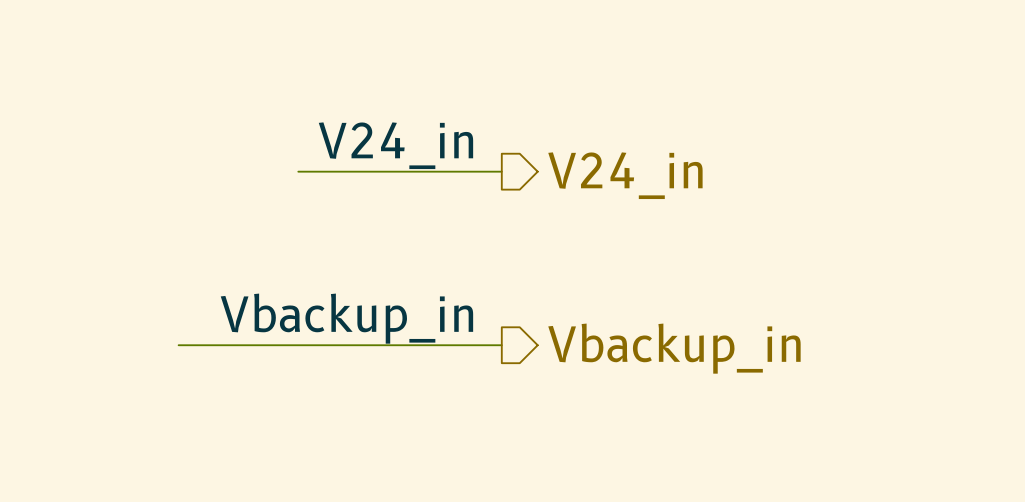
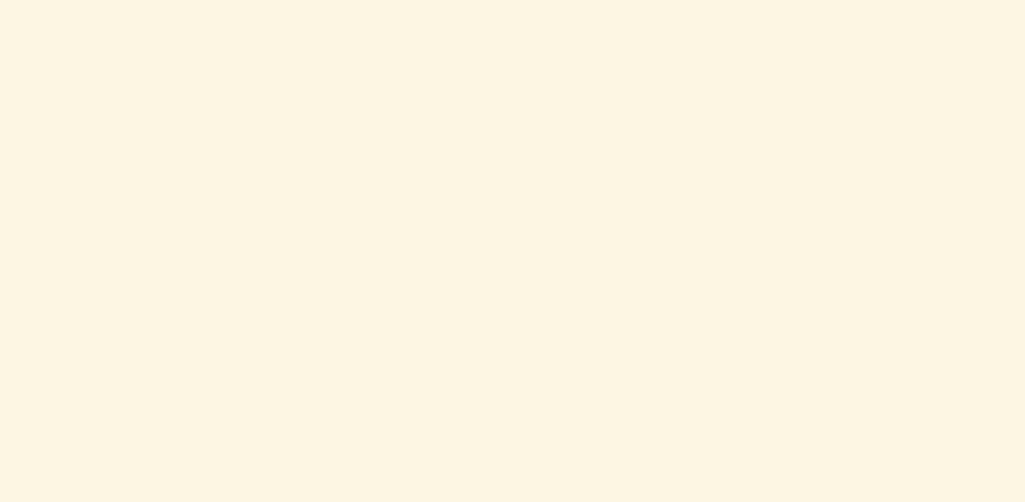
label: V24_in (395, 145) -> none
wire: (298, 171) (501, 171) -> none
hierarchical label: V24_in (625, 175) -> none
label: Vbackup_in (346, 318) -> none
wire: (178, 345) (501, 345) -> none
hierarchical label: Vbackup_in (674, 348) -> none

